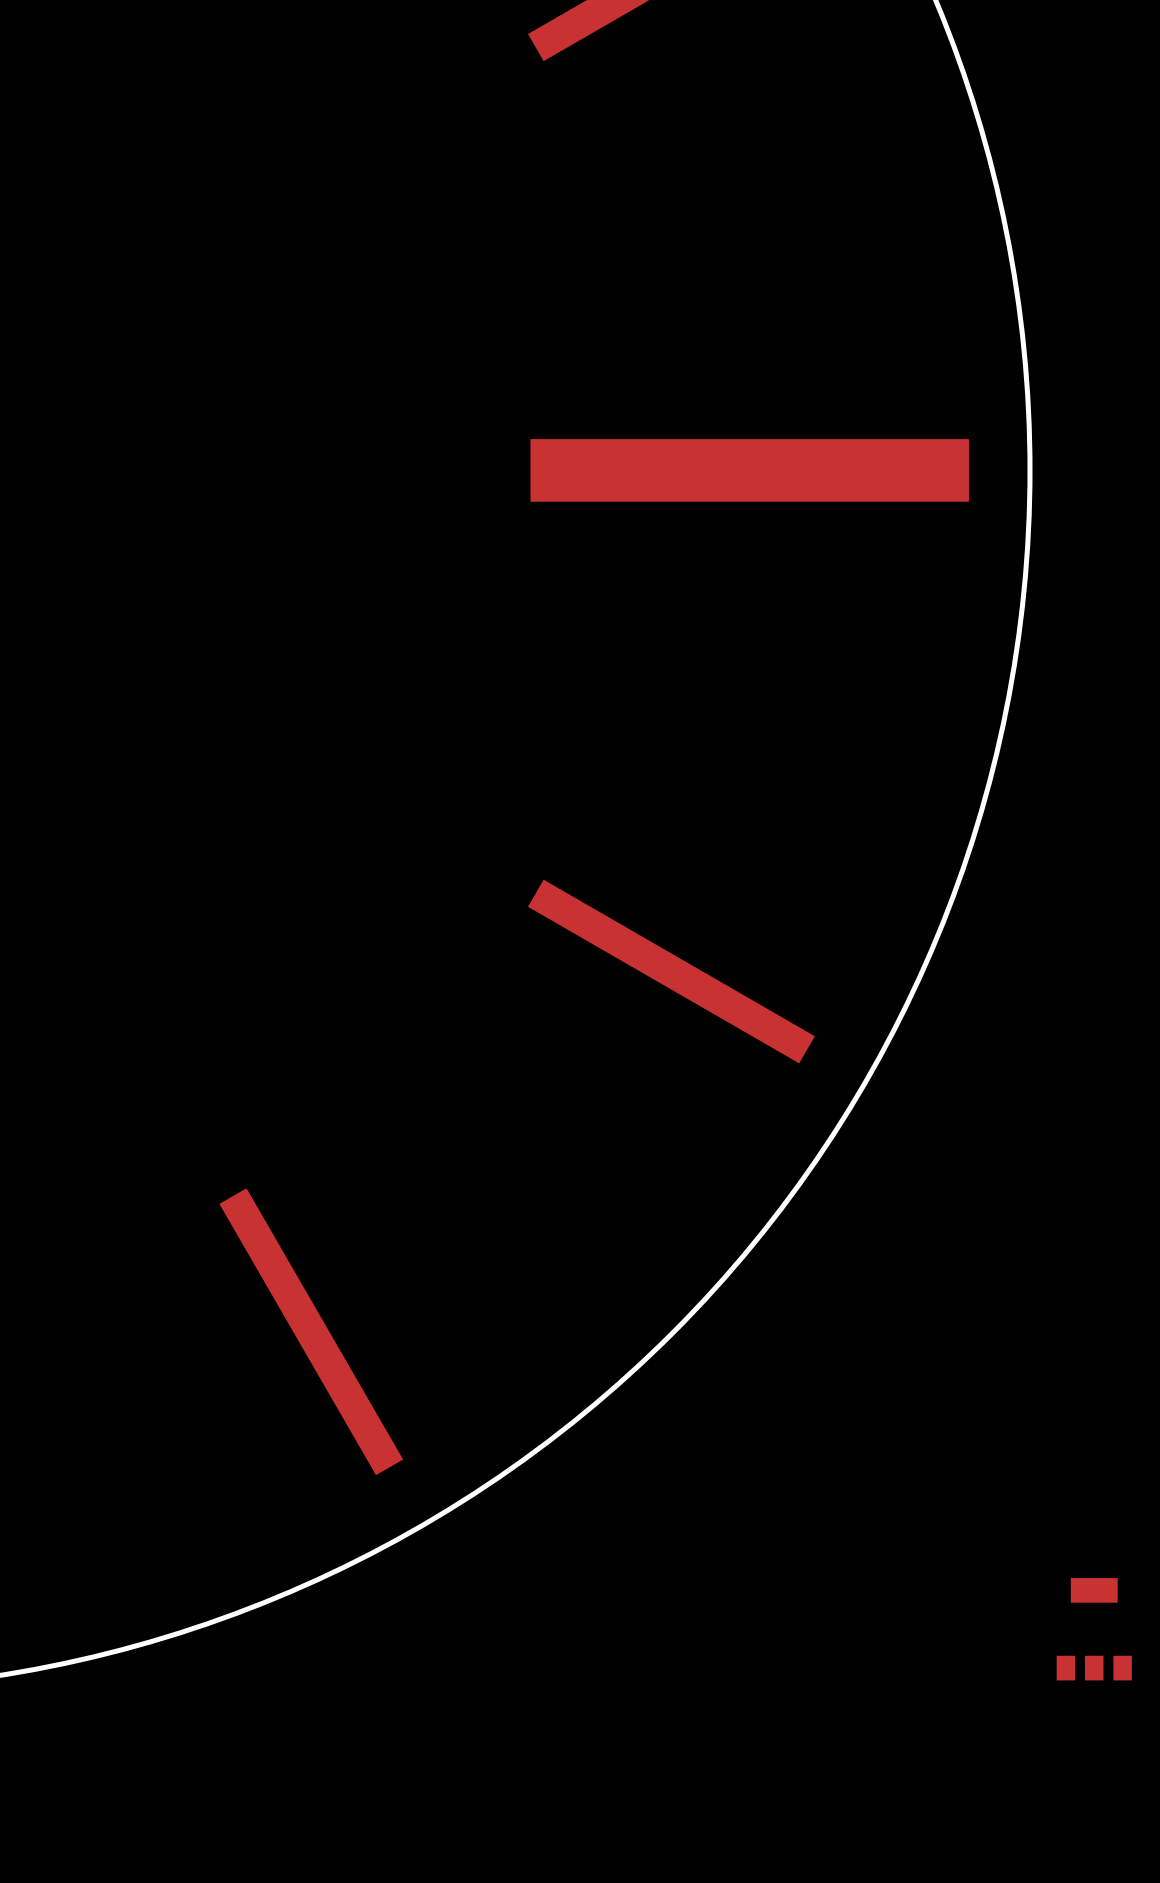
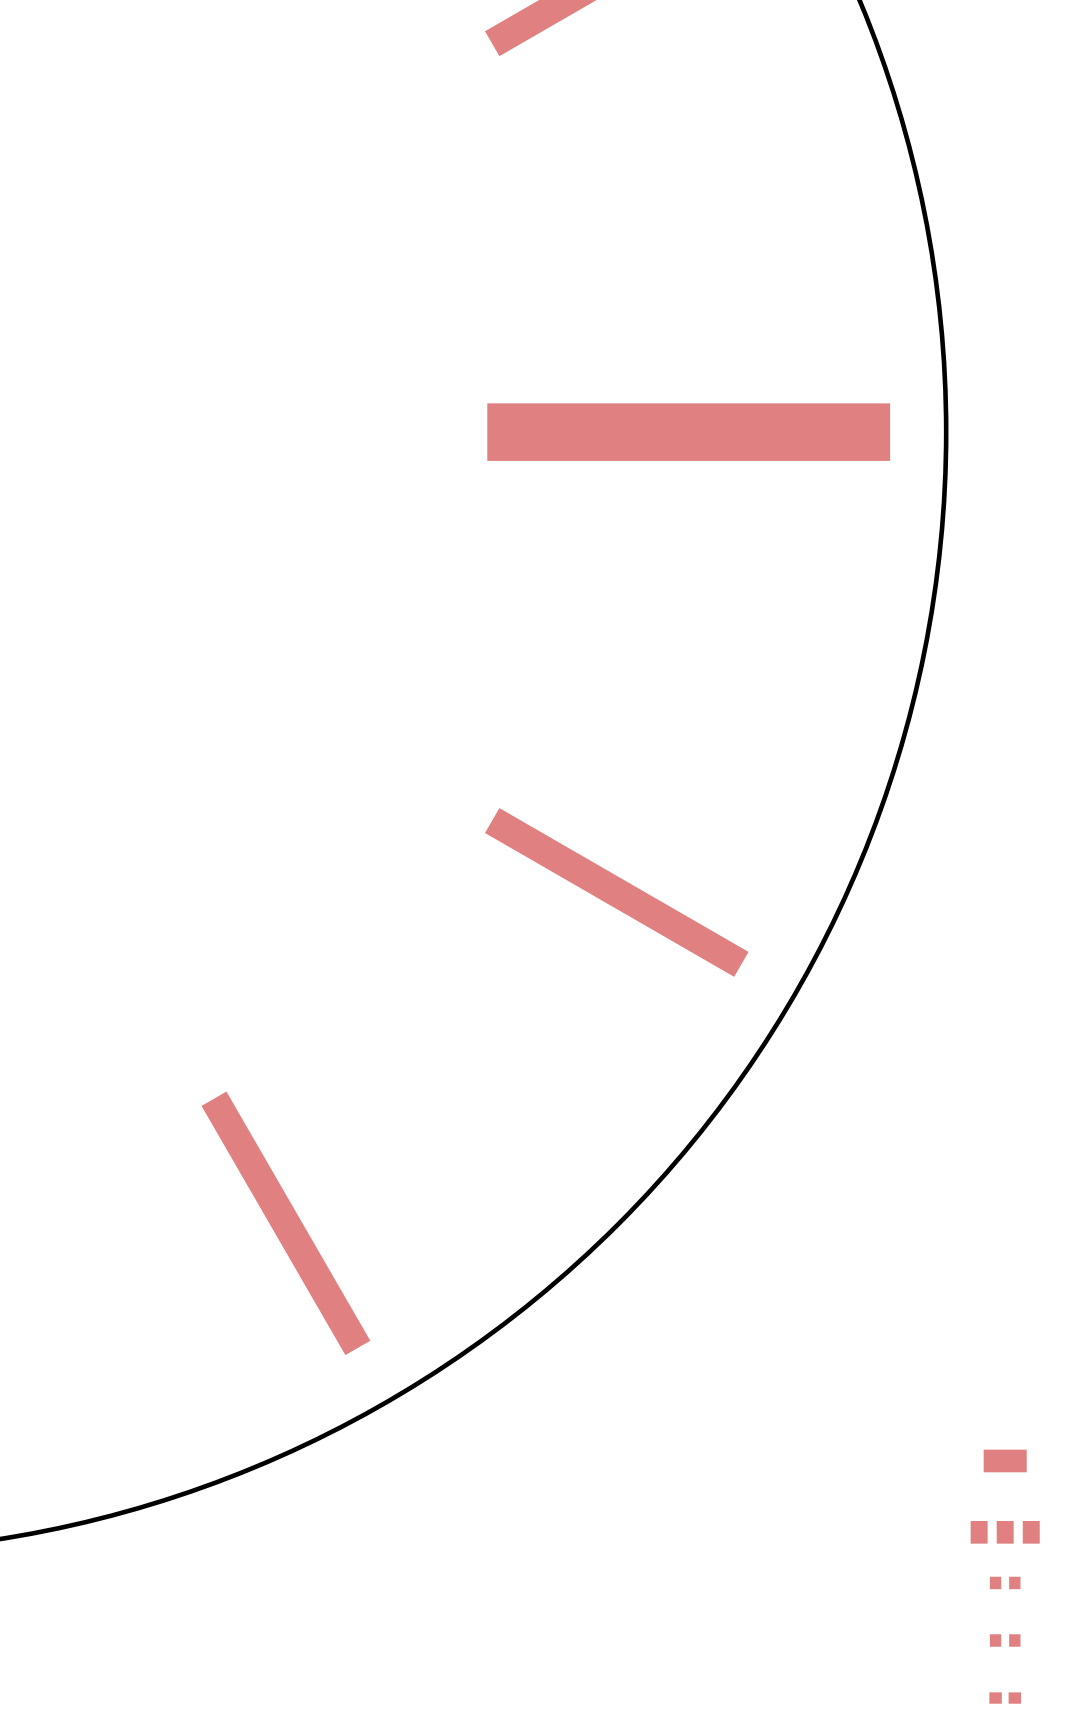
part: none -> (1005, 1582)
part: none -> (1005, 1640)
part: none -> (1005, 1698)

